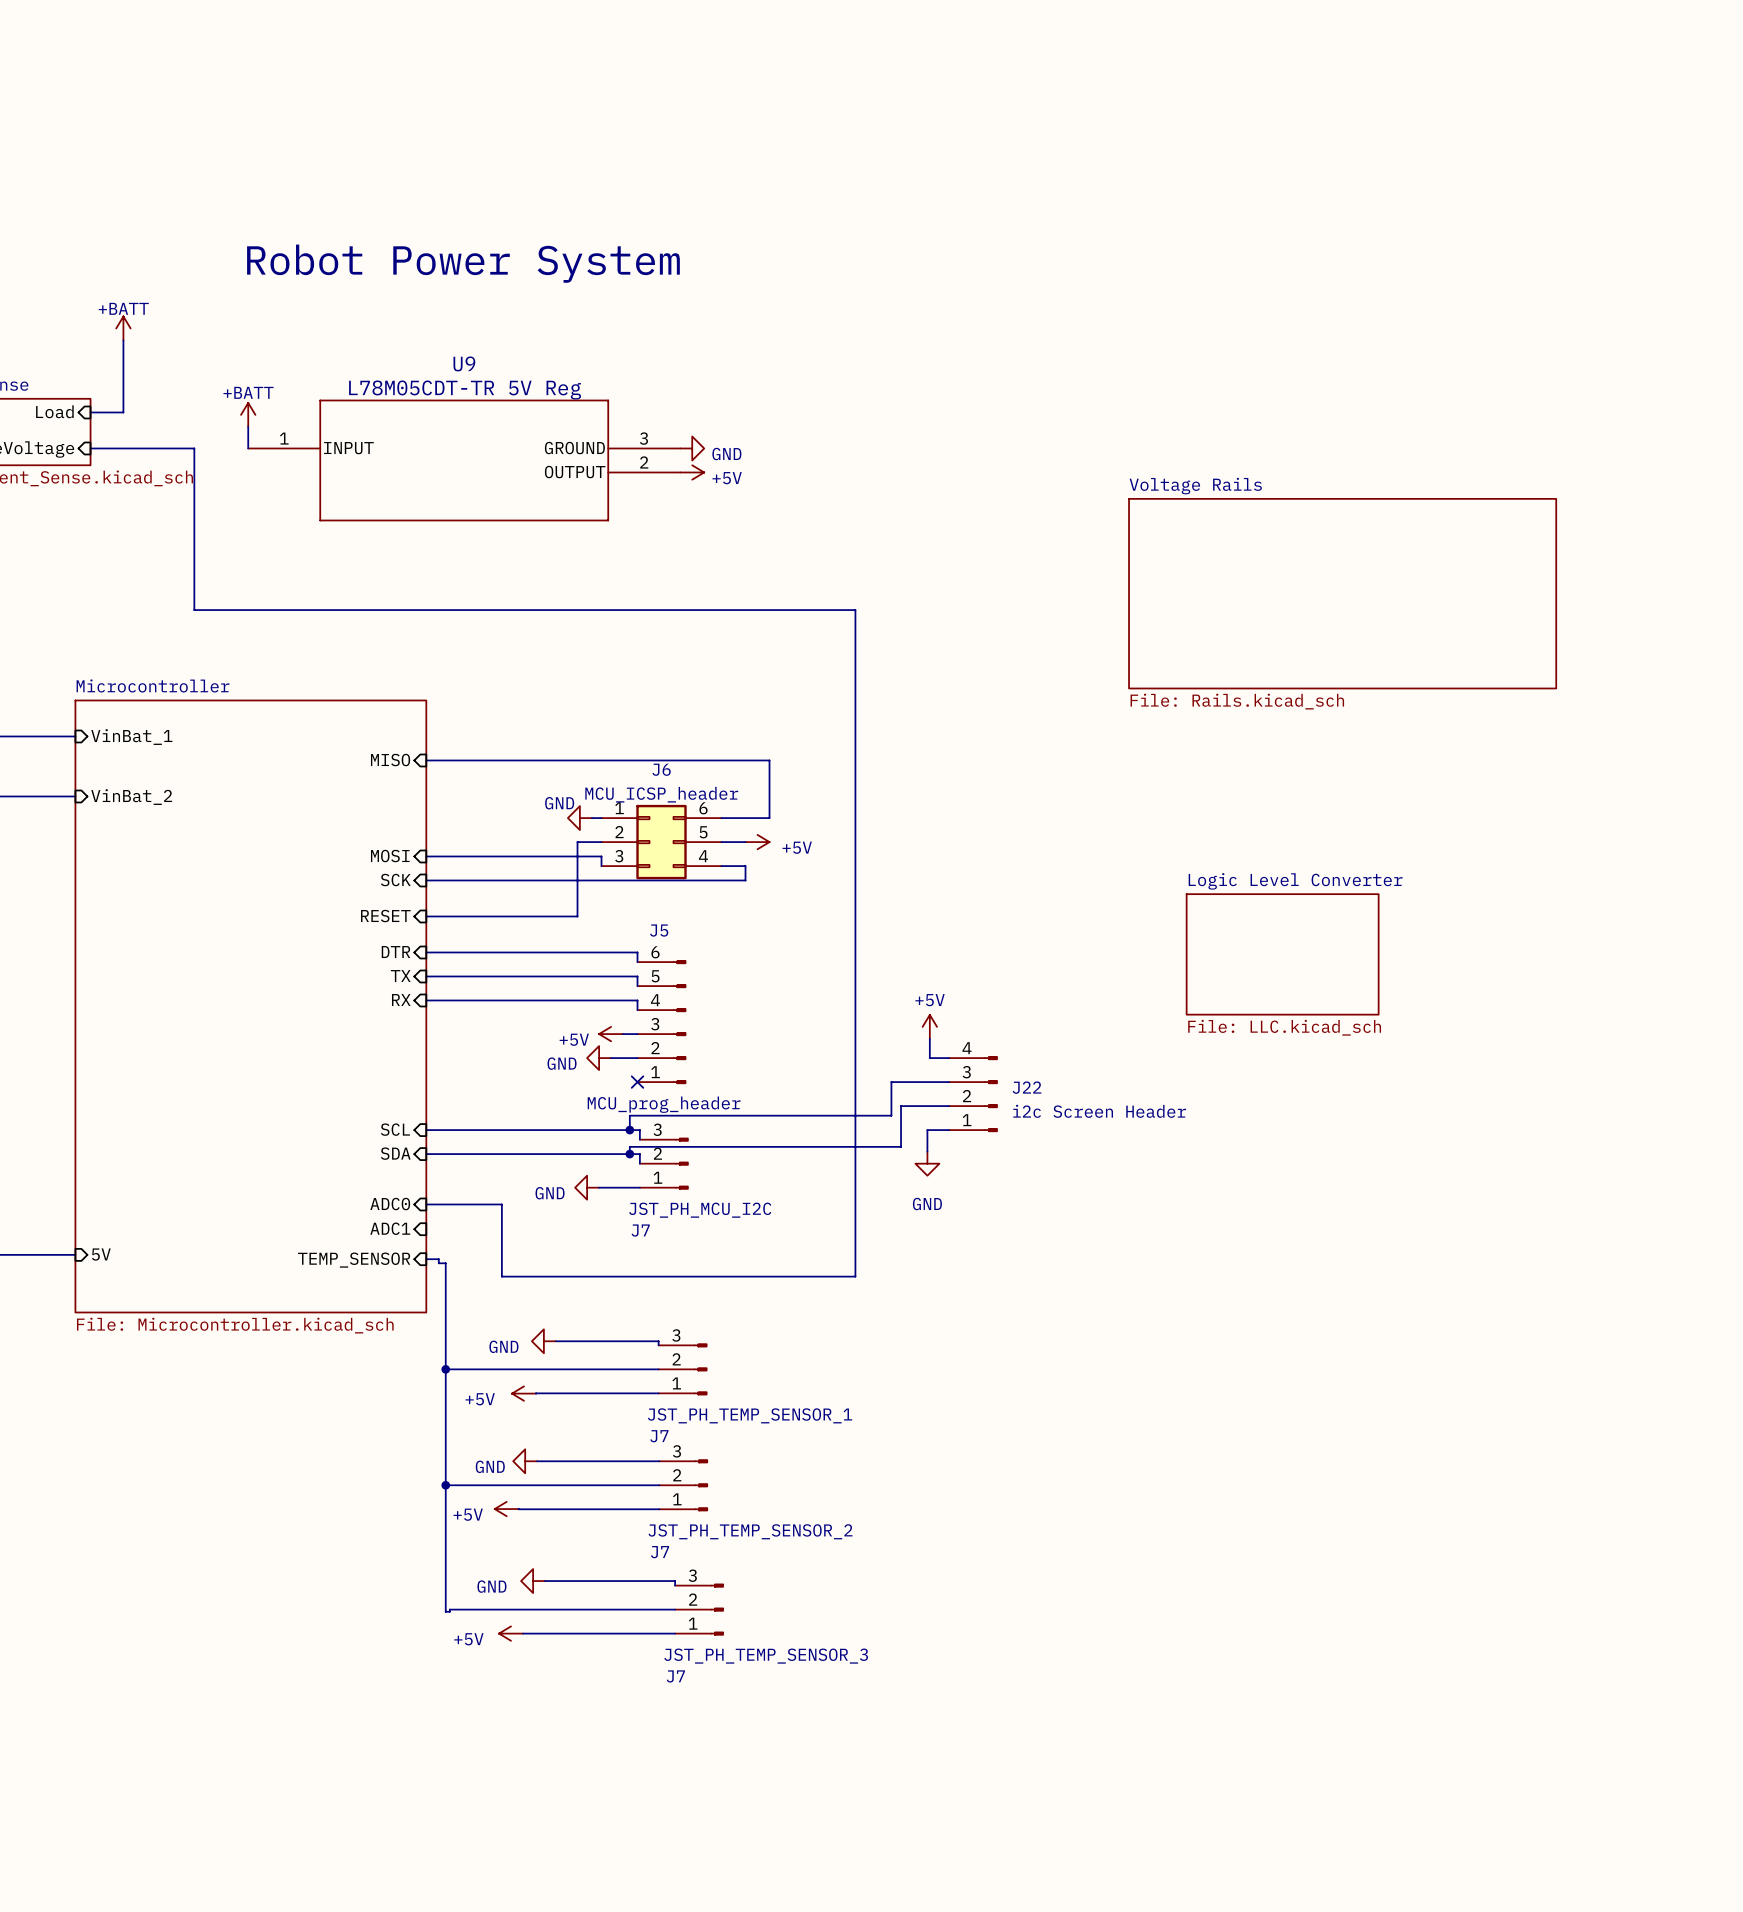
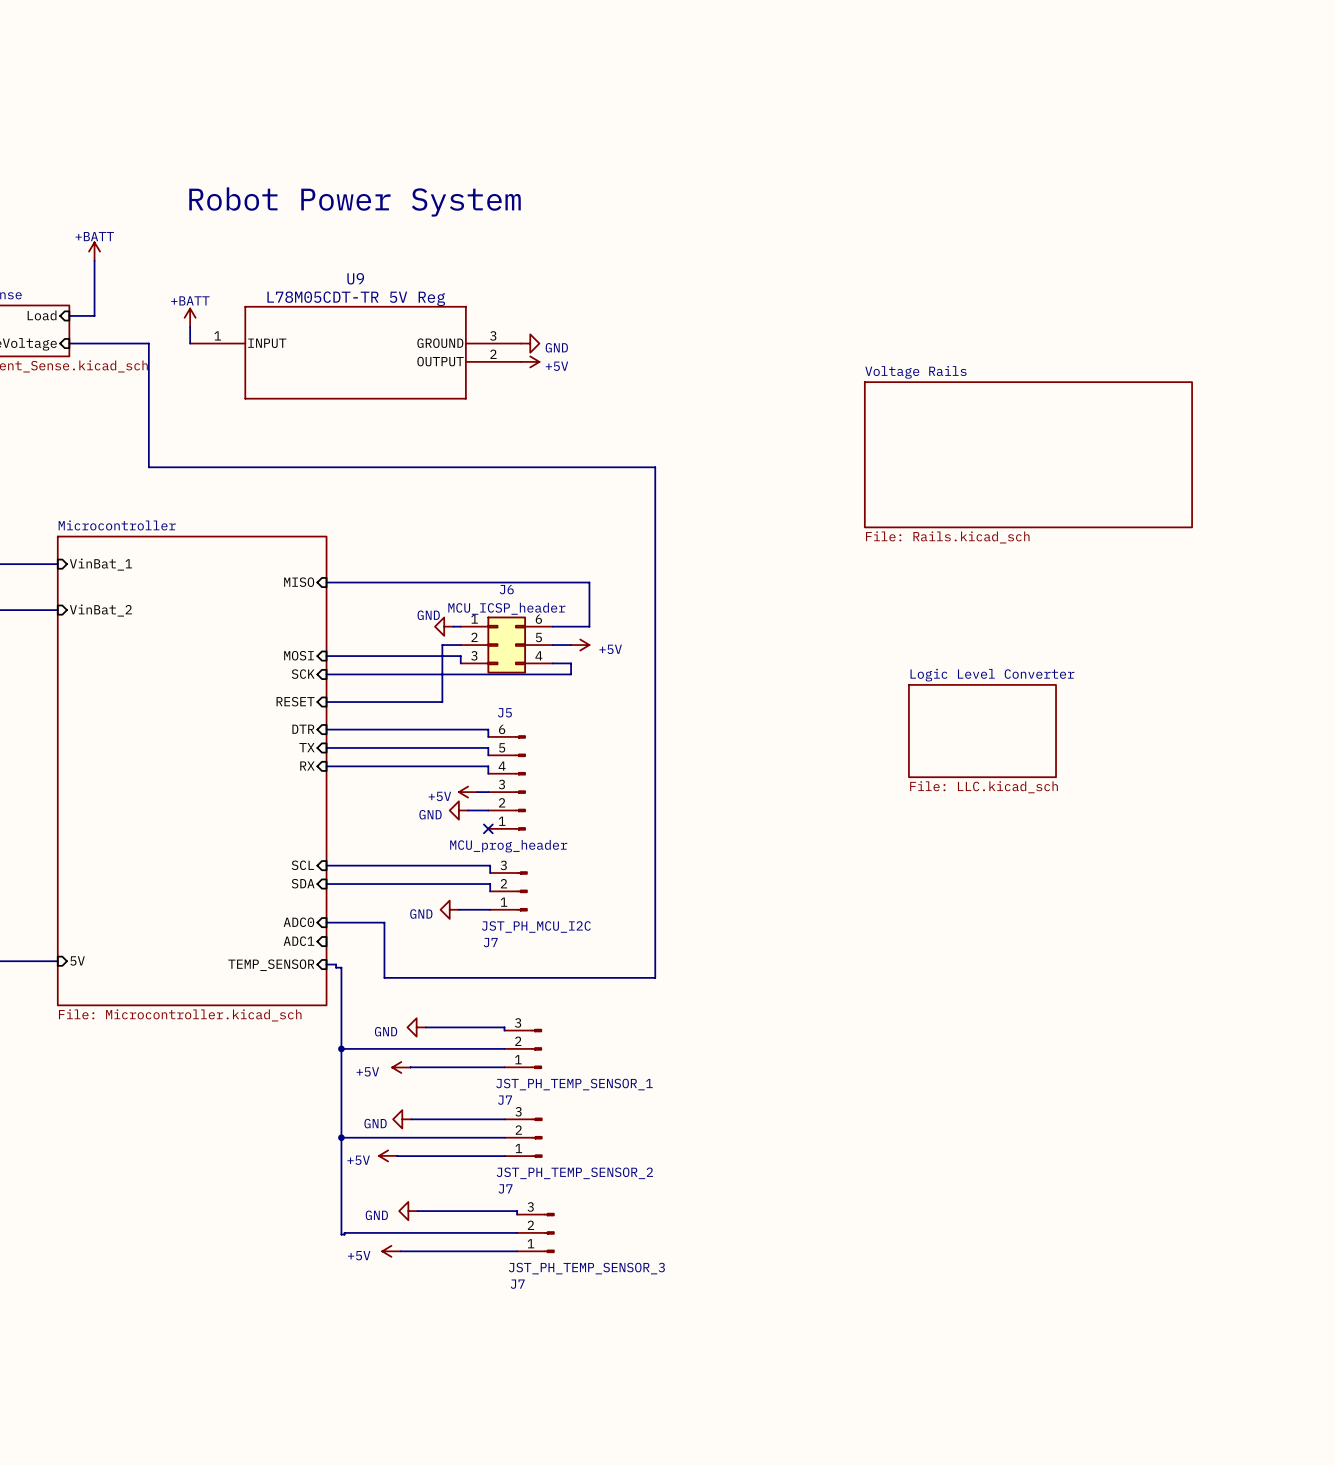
power symbol: +5V (929, 1026) -> none
wire: (929, 1038) (929, 1058) (949, 1058) -> none
wire: (949, 1082) (891, 1082) (891, 1115) (629, 1115) (629, 1130) -> none
J22: i2c Screen Header (973, 1094) -> none
wire: (949, 1106) (901, 1106) (901, 1146) (629, 1146) (629, 1154) -> none
junction: (629, 1130) -> none
wire: (949, 1130) (927, 1130) (927, 1151) -> none
junction: (629, 1154) -> none
power symbol: GND (927, 1163) -> none

